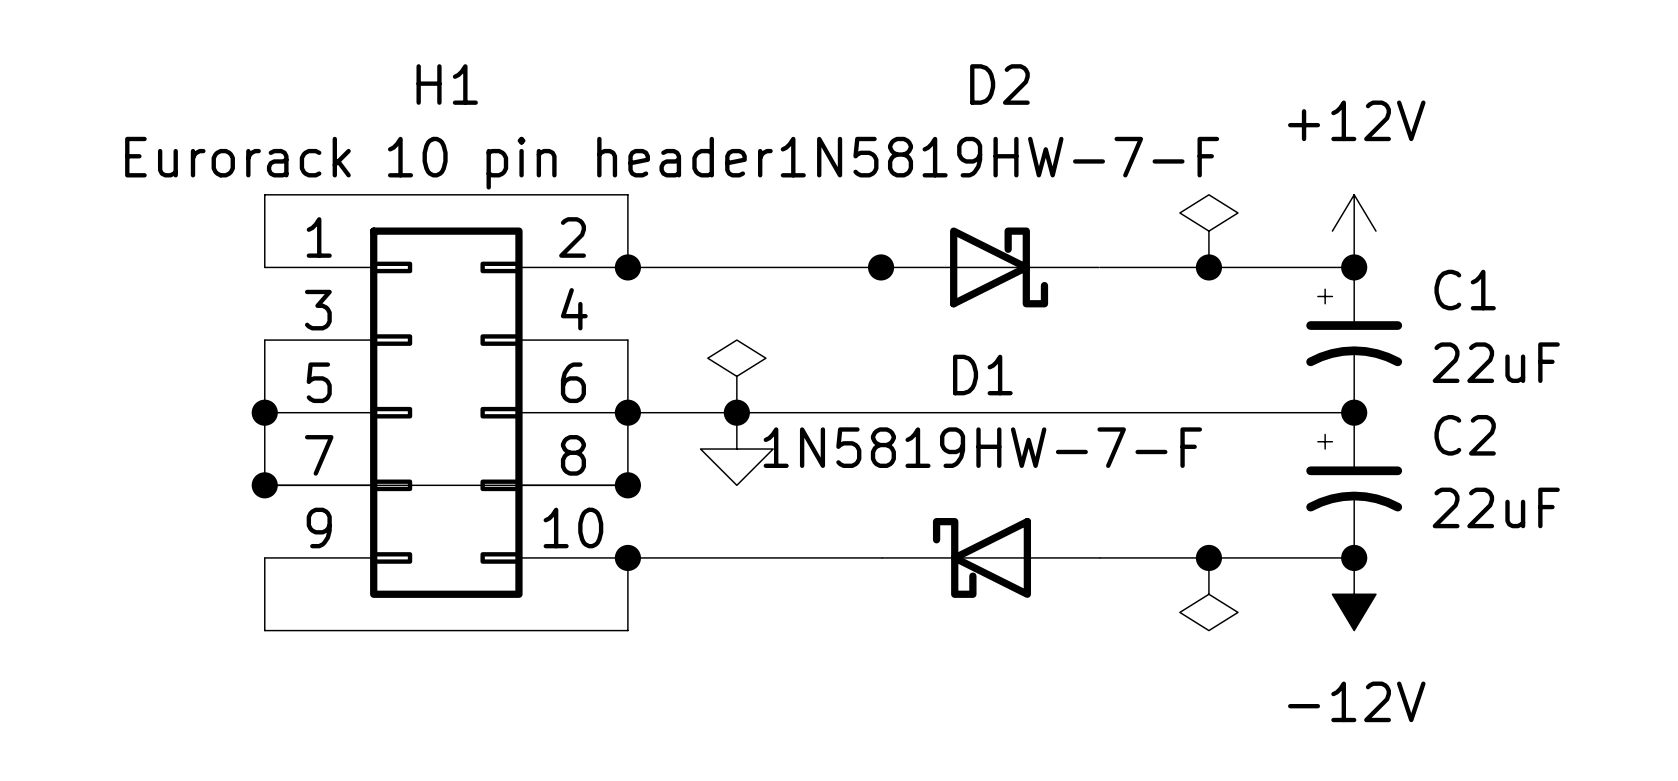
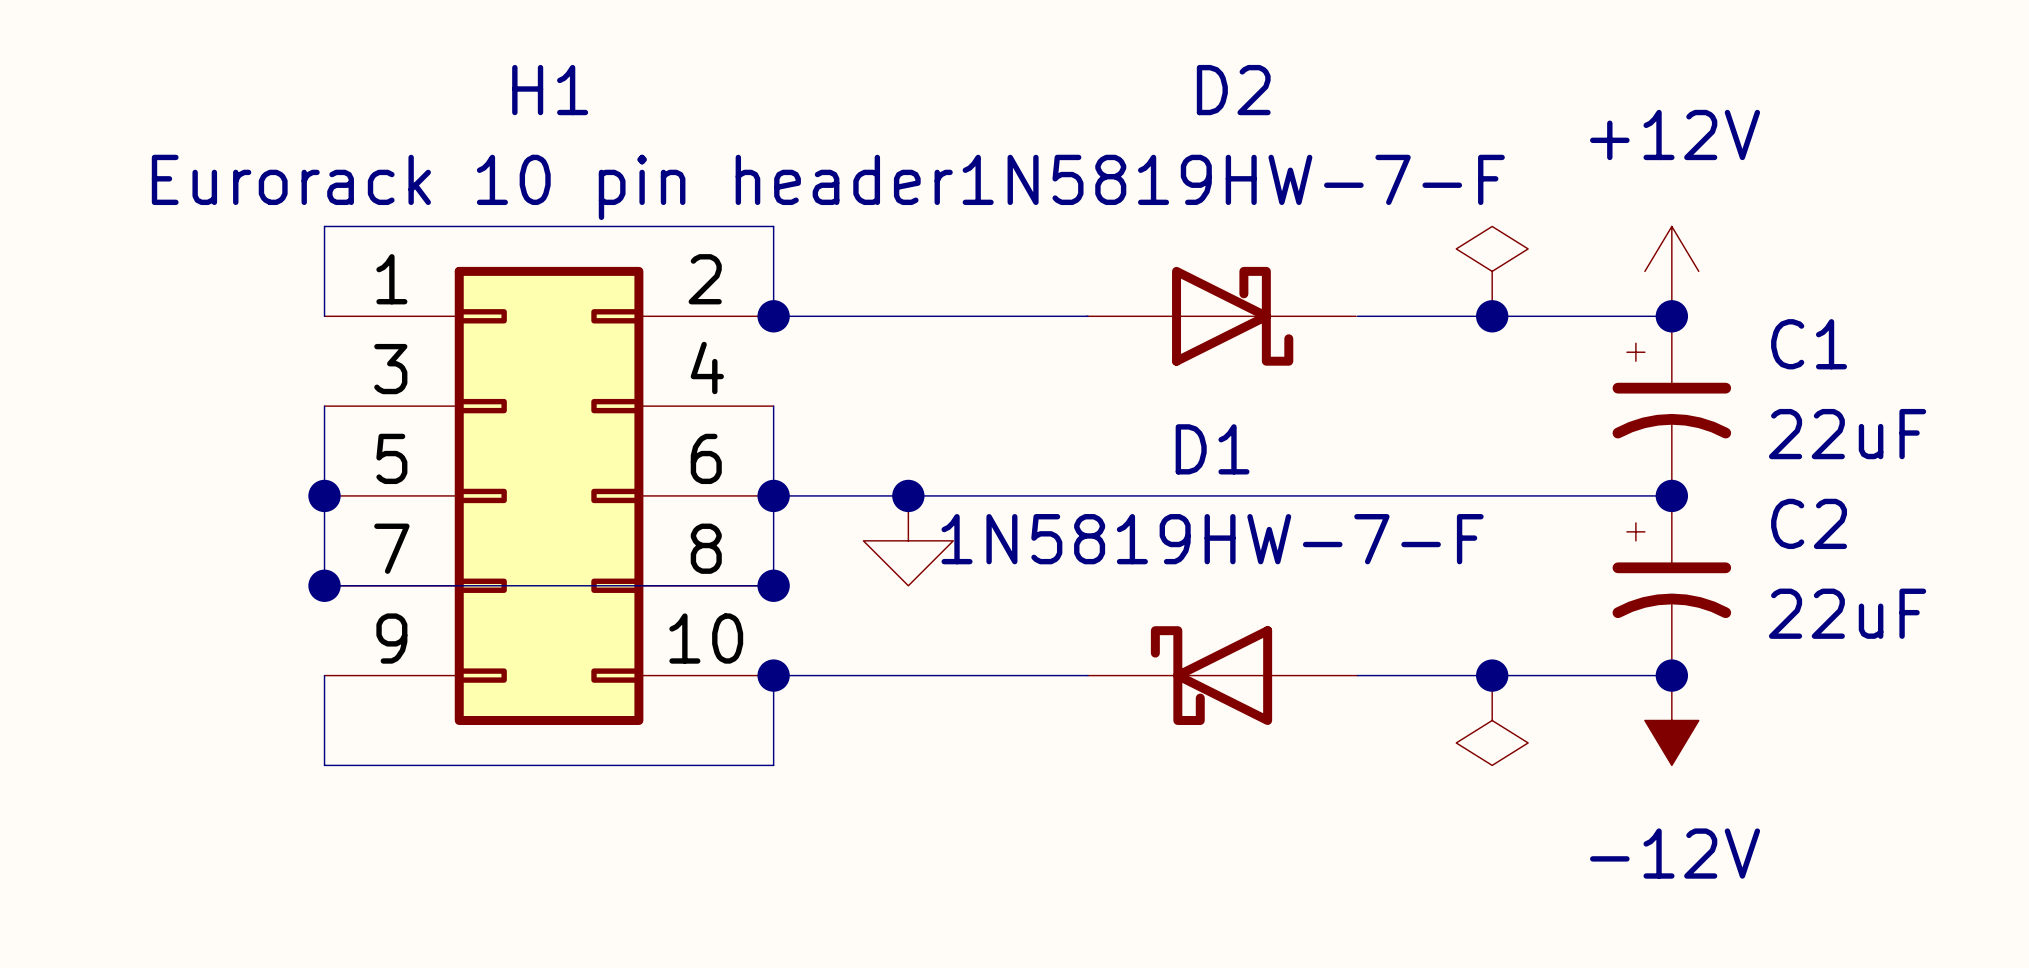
junction: (881, 267) -> none
power symbol: (736, 376) -> none

